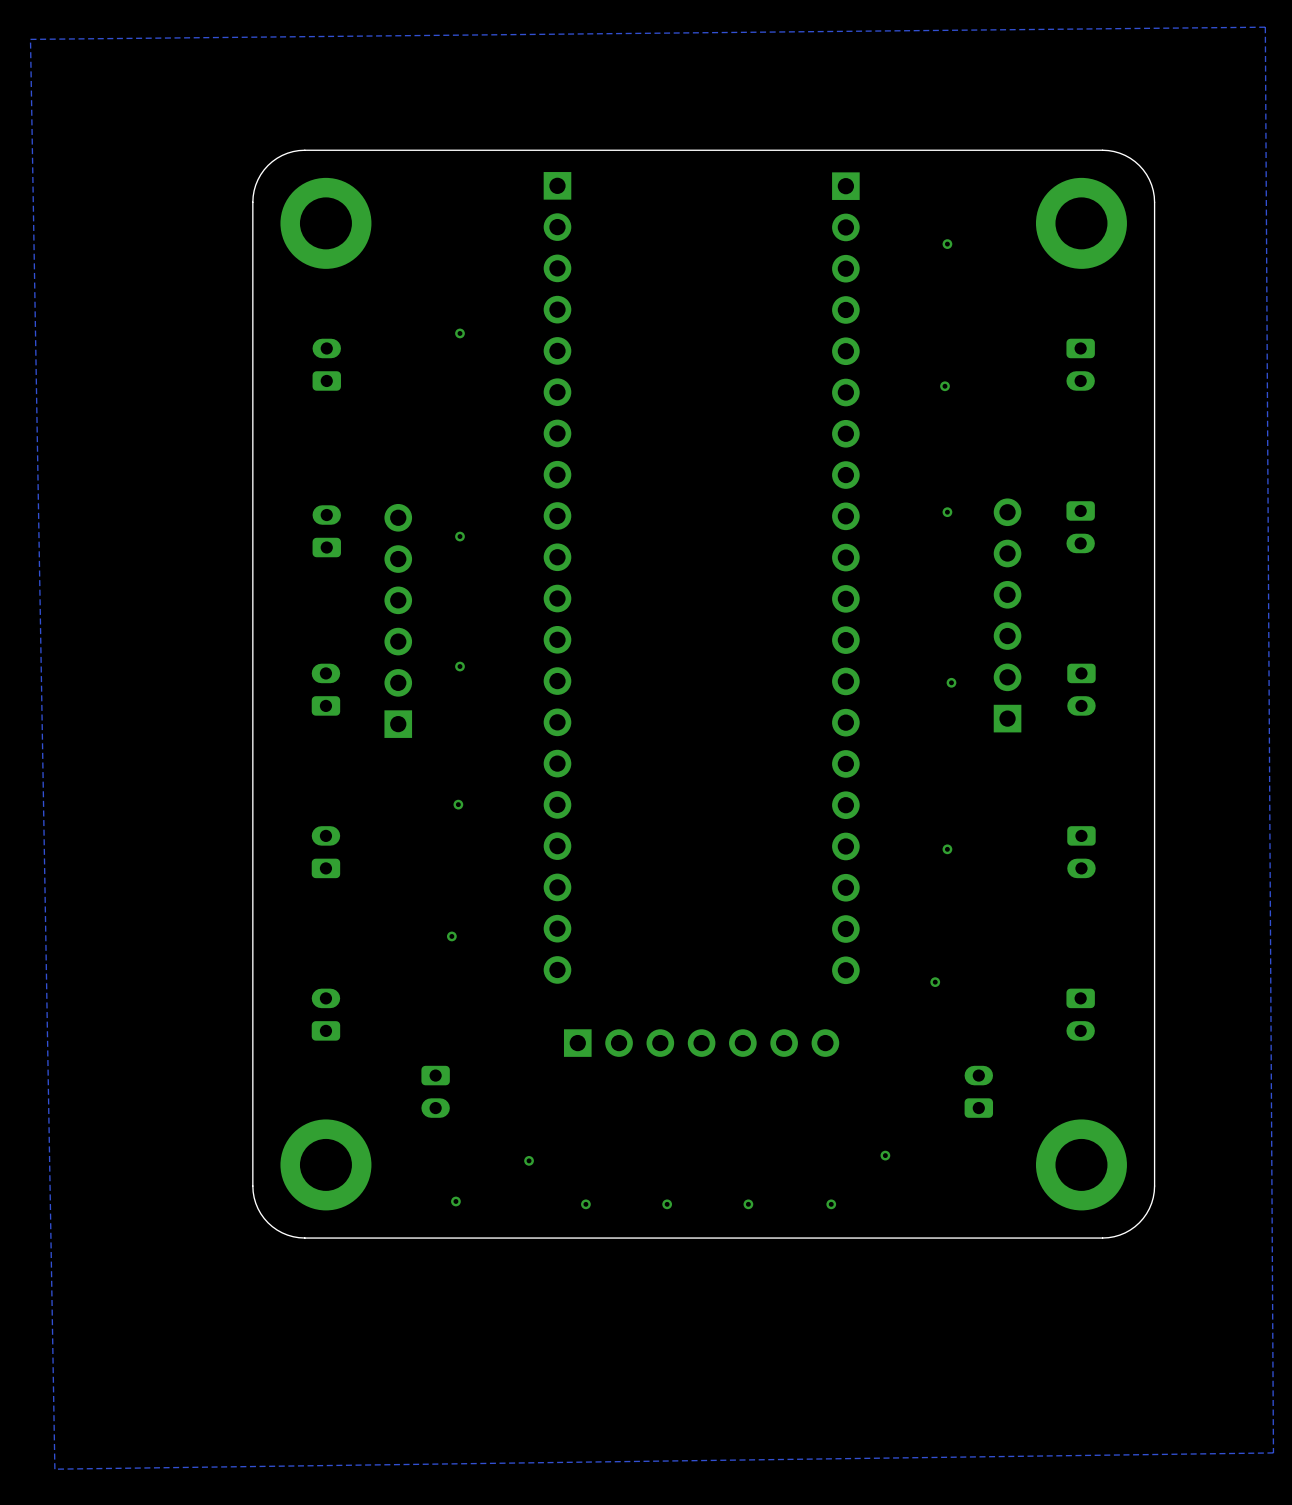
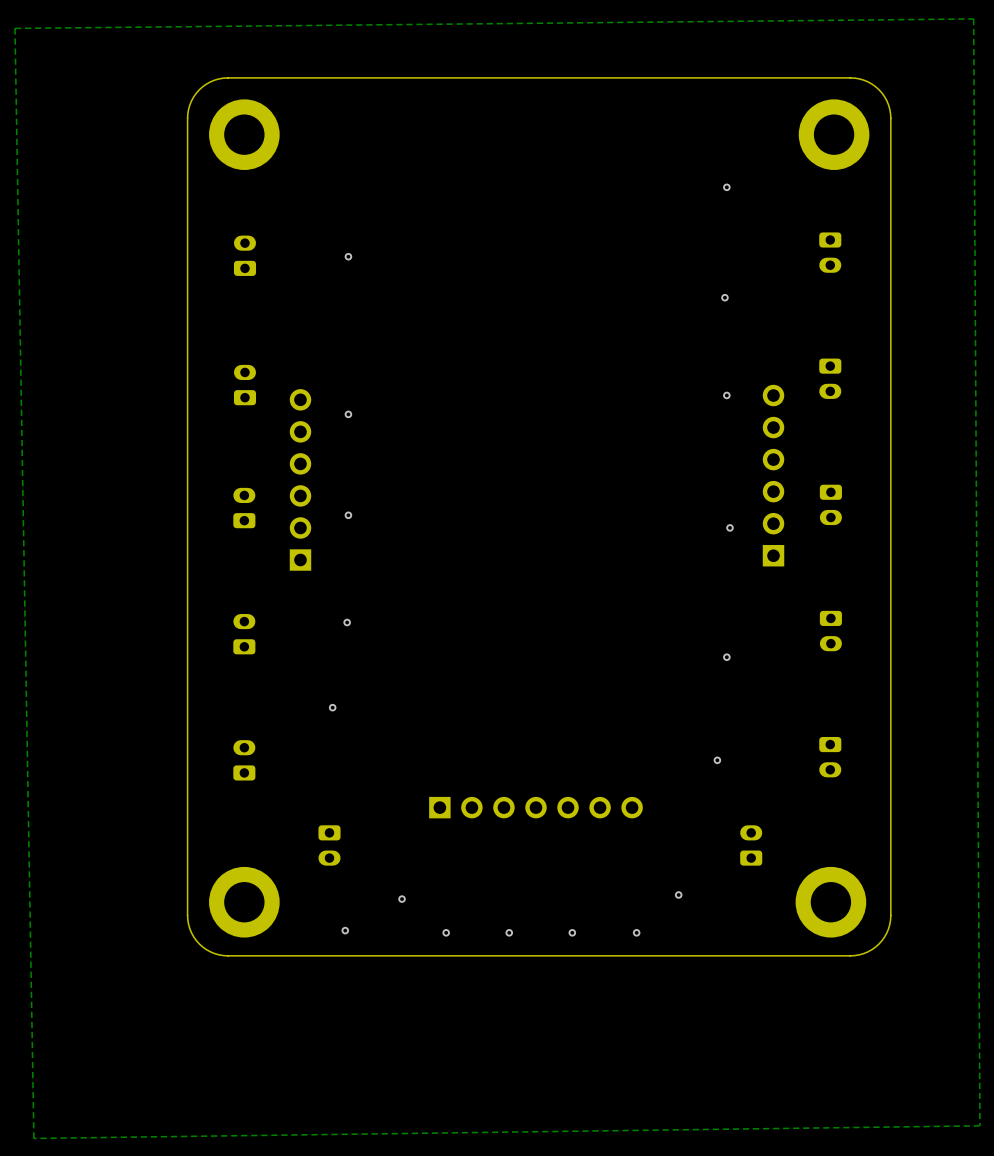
board edge: (252, 202) (257, 179) (268, 165) (282, 155) (304, 150) (1102, 150) (1125, 155) (1139, 165) (1151, 185) (1154, 202) (1154, 1186) (1149, 1208) (1139, 1222) (1125, 1232) (1108, 1237) (304, 1238) (287, 1235) (268, 1222) (255, 1203) (252, 1181) -> (187, 154) (187, 113) (191, 100) (196, 93) (206, 84) (214, 80) (227, 77) (854, 78) (867, 81) (879, 89) (886, 100) (890, 118) (890, 915) (888, 928) (882, 940) (867, 951) (850, 955) (227, 955) (214, 953) (199, 944) (189, 928) (187, 915)
part position: (325, 223) -> (244, 134)
part position: (1081, 223) -> (834, 134)
part position: (326, 364) -> (244, 255)
part position: (1080, 364) -> (830, 252)
part position: (1080, 527) -> (830, 378)
part position: (326, 531) -> (244, 385)
part: (557, 577) -> none
part: (845, 578) -> none
part position: (325, 689) -> (244, 508)
part position: (1081, 689) -> (830, 504)
part position: (325, 852) -> (244, 634)
part position: (1081, 852) -> (830, 631)
via position: (451, 936) -> (332, 707)
part position: (325, 1014) -> (244, 760)
part position: (1080, 1014) -> (830, 757)

